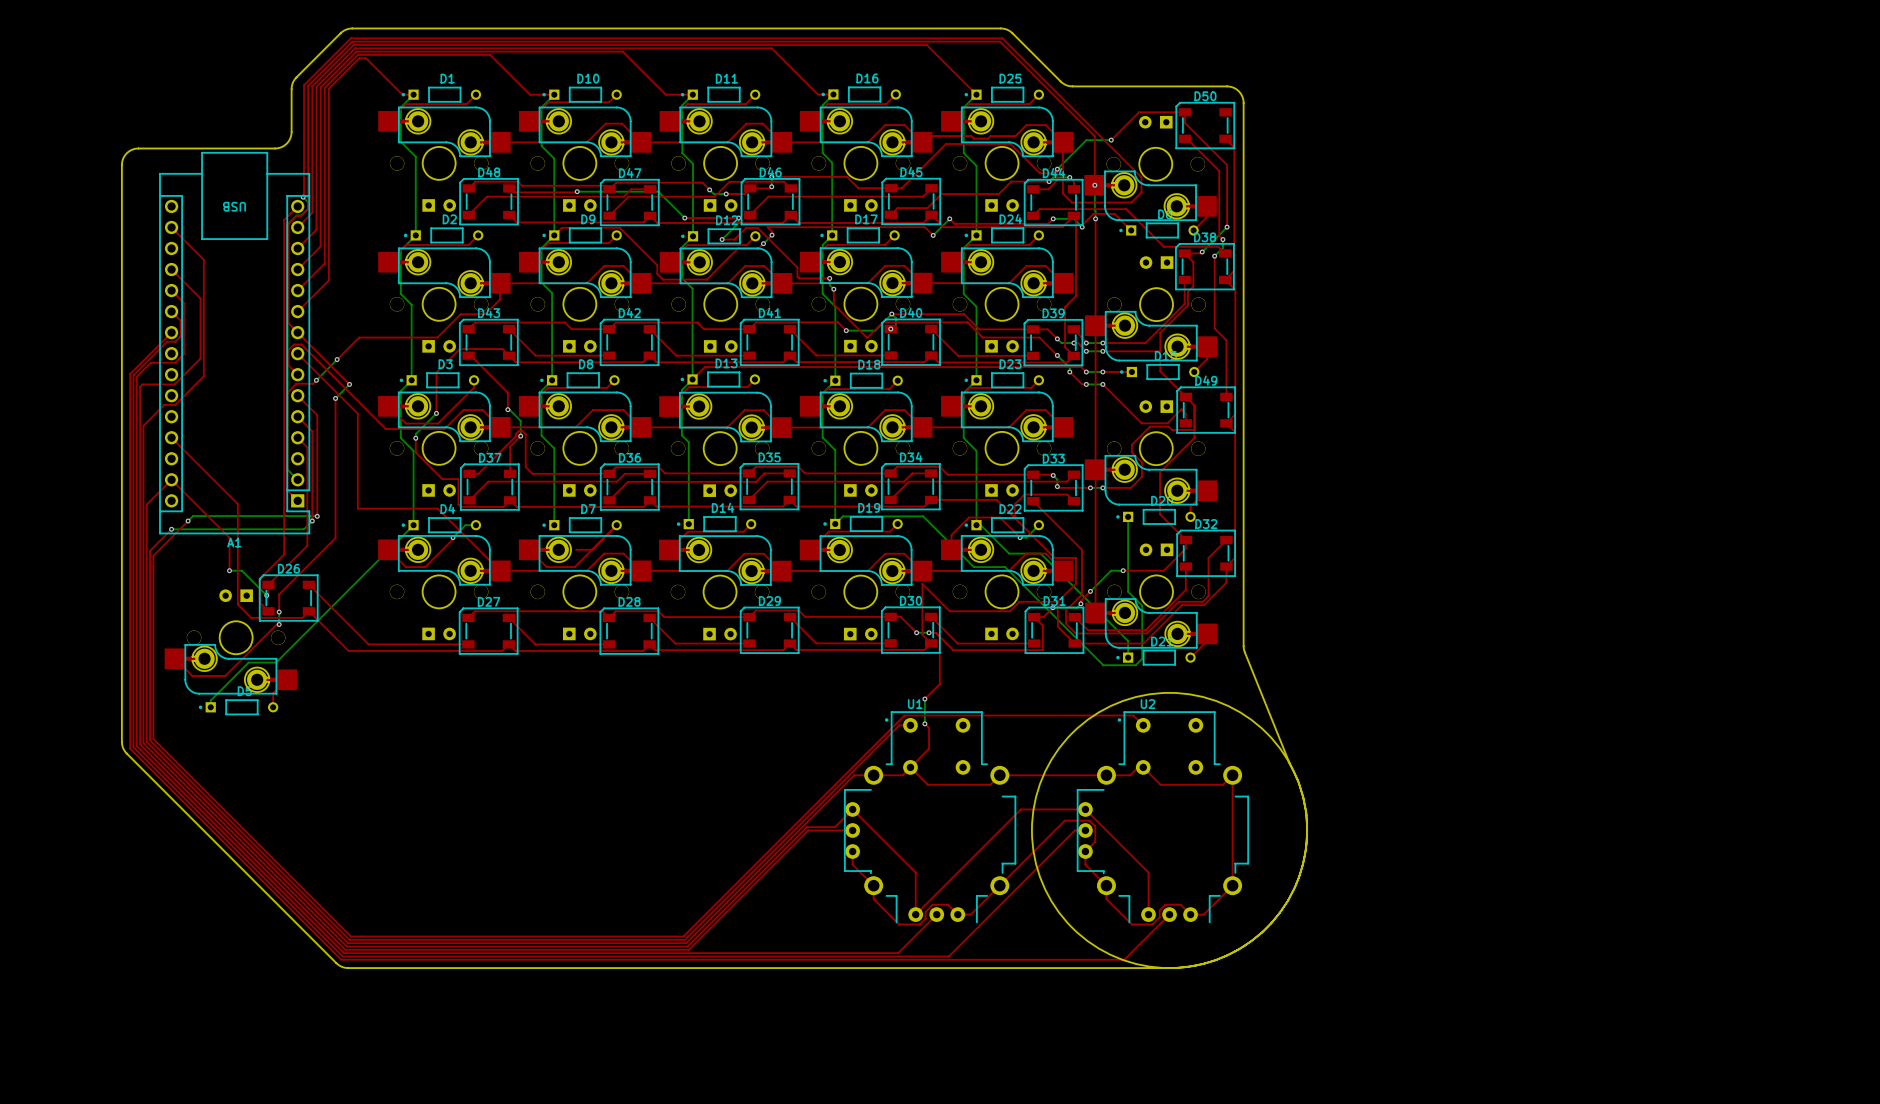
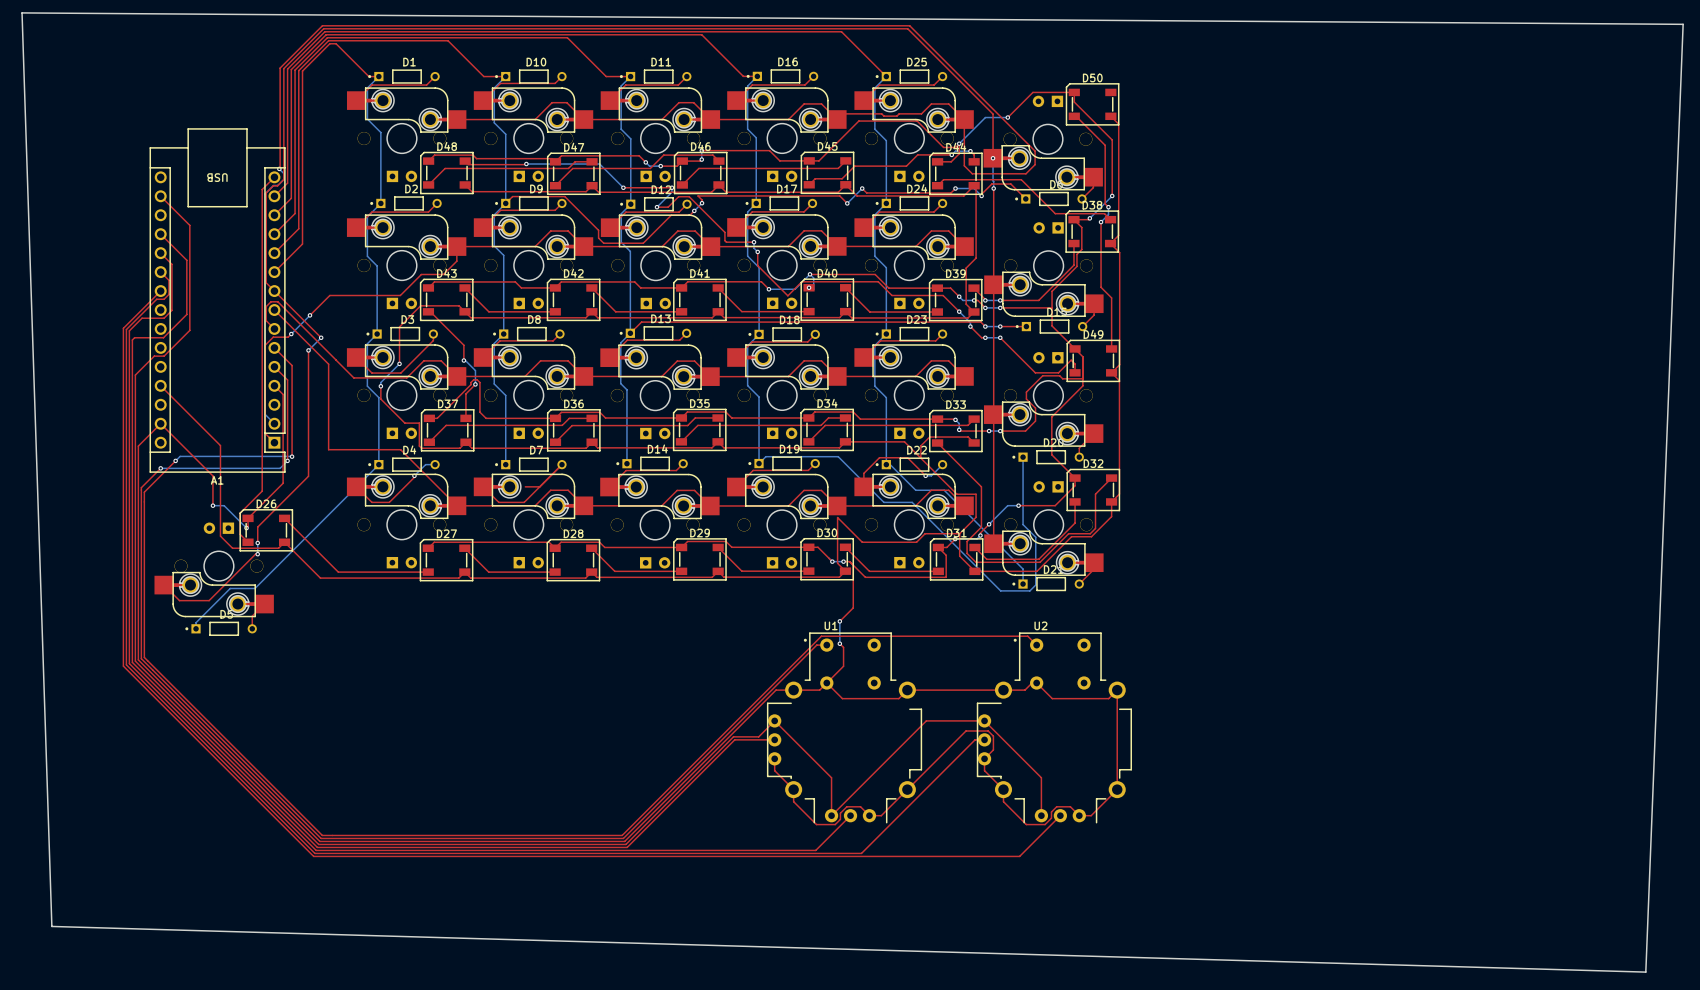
board edge: (352, 28) (1002, 28) (1011, 32) (1060, 81) (1067, 85) (1227, 86) (1238, 91) (1243, 102) (1243, 647) (1298, 781) (1306, 812) (1307, 829) (1304, 855) (1295, 886) (1279, 912) (1263, 931) (1244, 946) (1226, 955) (1205, 963) (1175, 967) (348, 968) (336, 963) (126, 753) (122, 746) (121, 165) (125, 154) (136, 148) (275, 148) (283, 145) (289, 140) (291, 133) (291, 89) (293, 81) (340, 33) (352, 28) -> (22, 12) (51, 926) (1645, 972) (1683, 24) (22, 12)
round board edge: [1031, 692, 1308, 969] -> none

